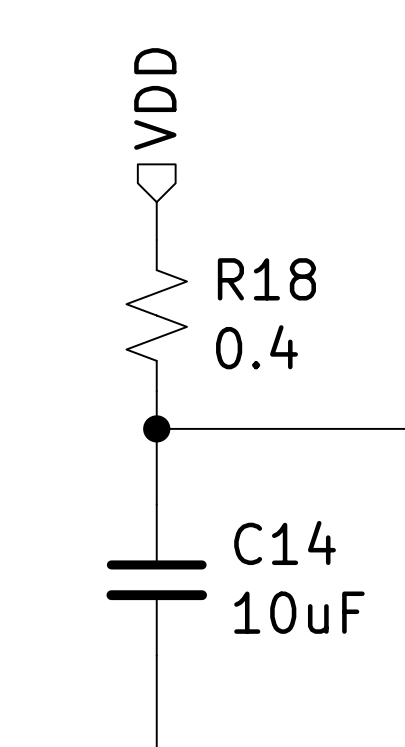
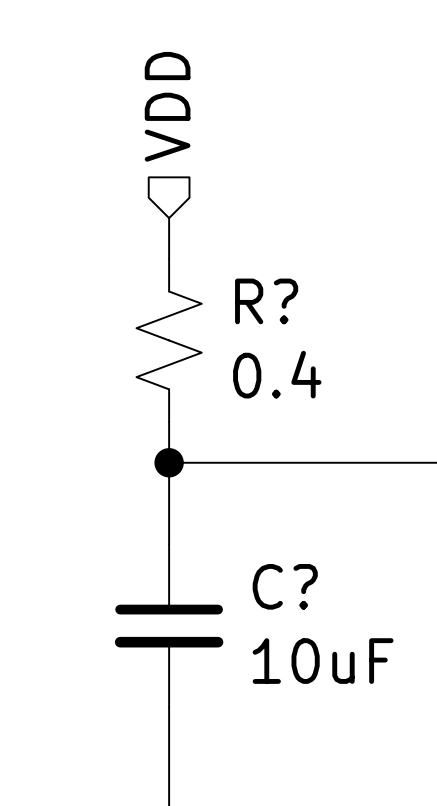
R18 name: R18 (266, 279) -> R? (266, 301)
C14 name: C14 (285, 542) -> C? (285, 586)

